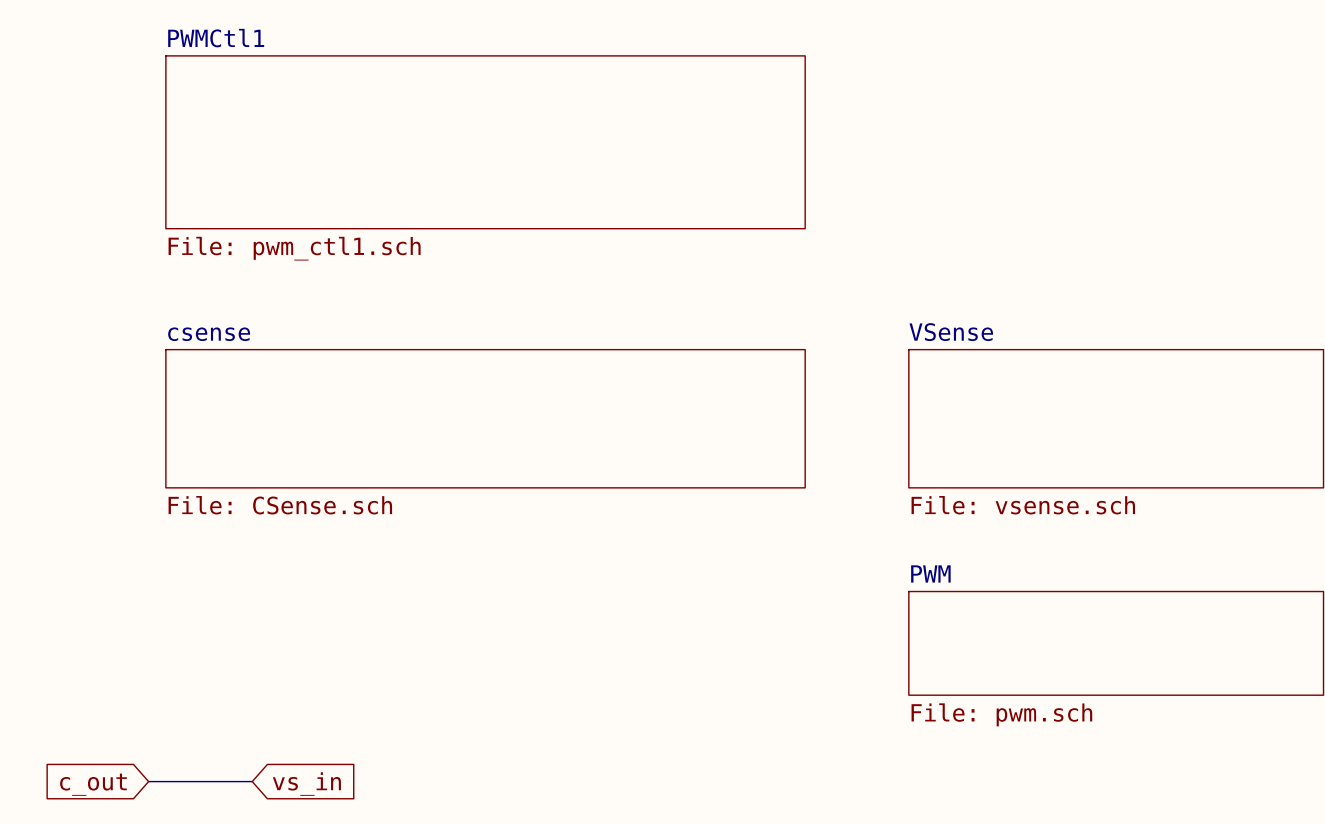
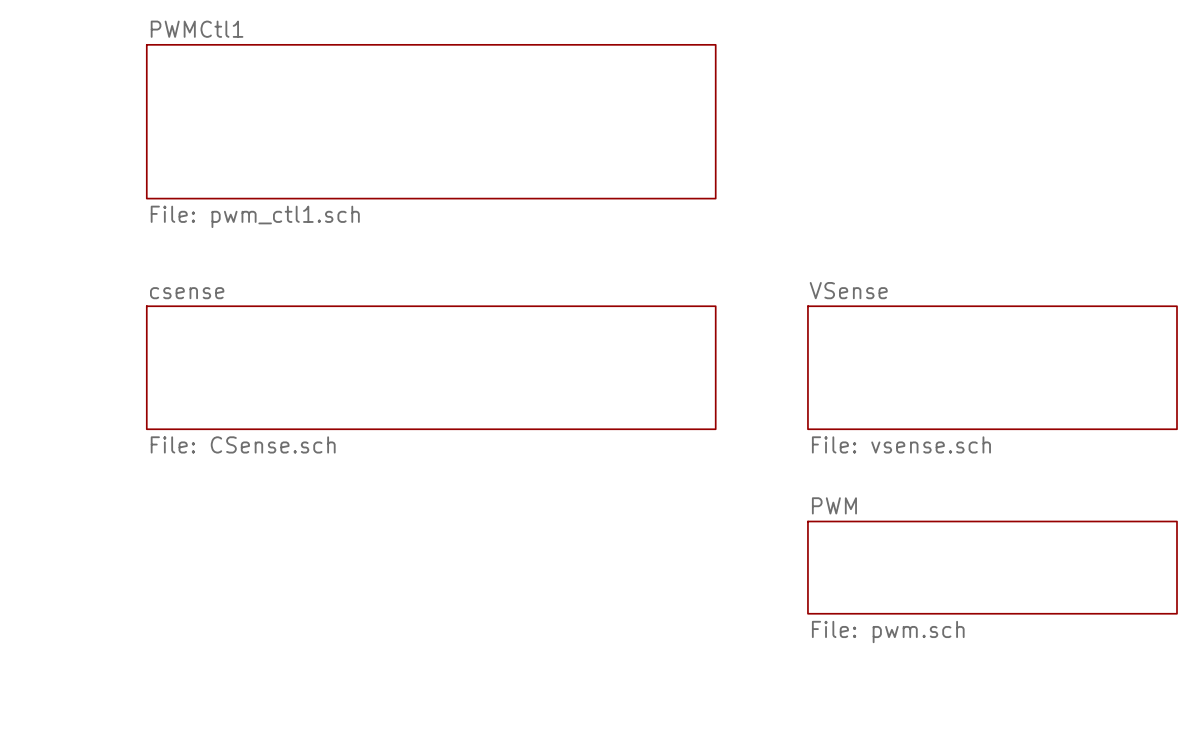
wire: (148, 781) (252, 781) -> none
global label: c_out (93, 784) -> none
global label: vs_in (306, 784) -> none

